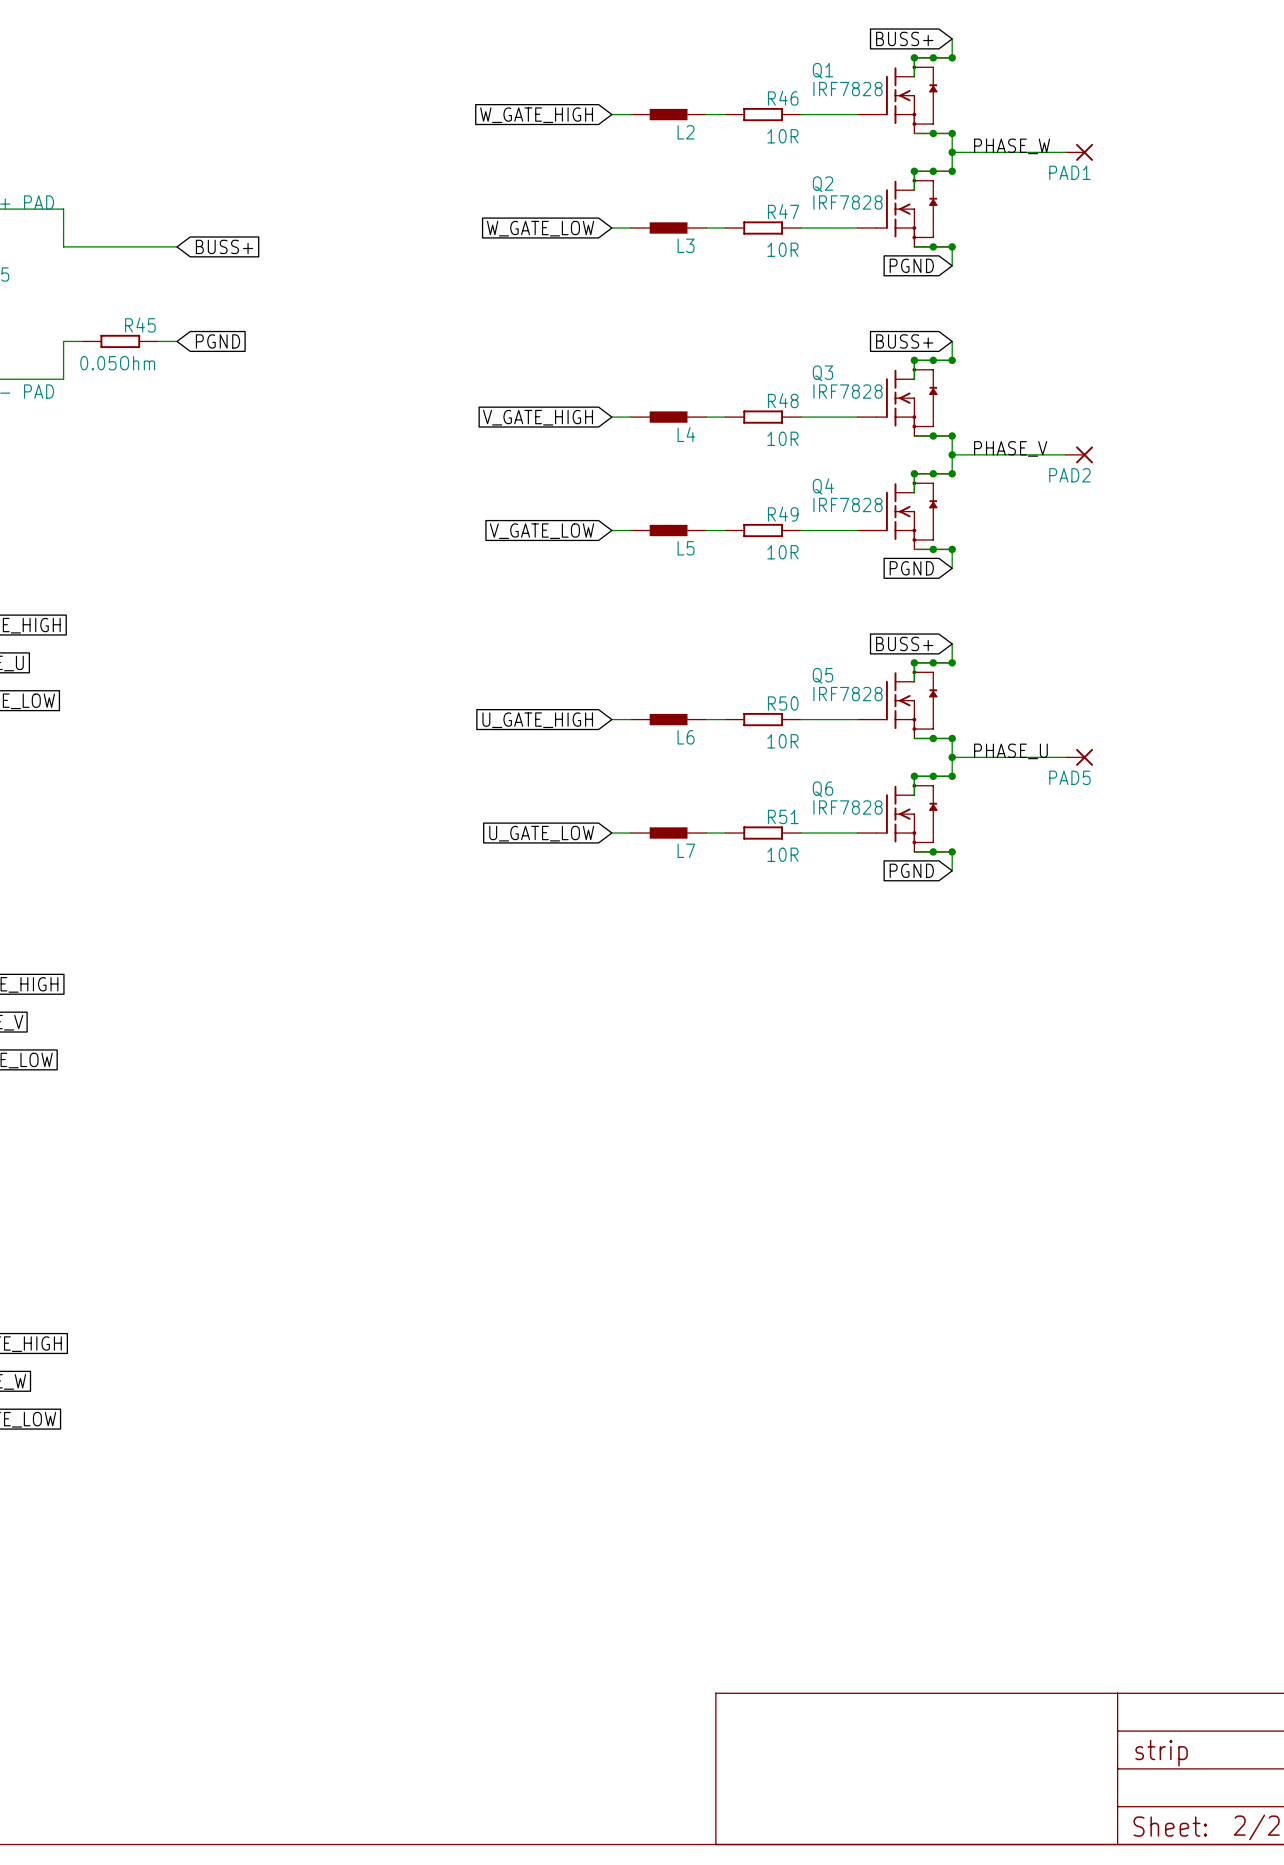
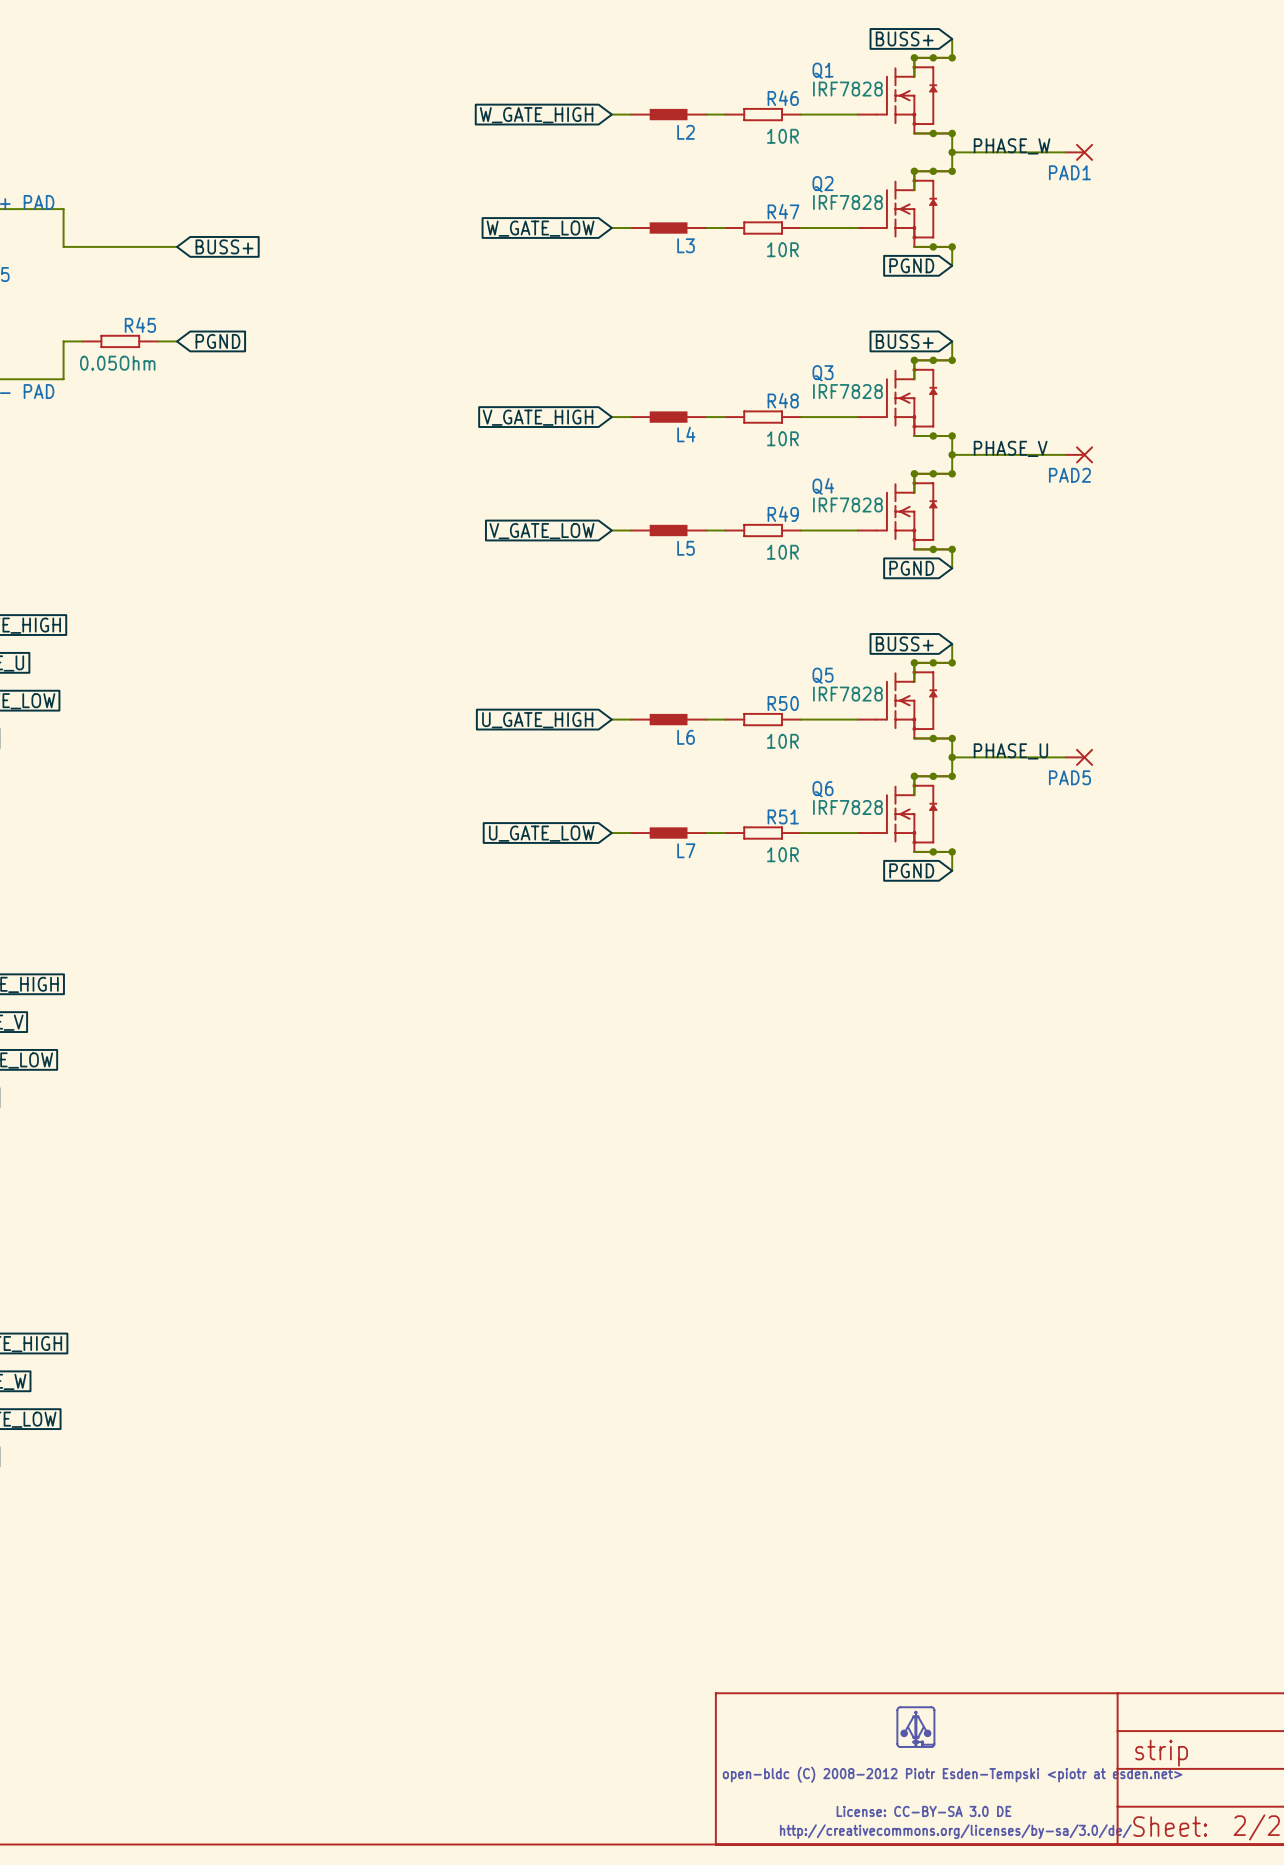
part: none -> (915, 1727)
text: none -> open-bldc (C) 2008-2012 Piotr Esden-Tempski <piotr at esden.net> (952, 1774)
text: none -> License: CC-BY-SA 3.0 DE (923, 1811)
text: none -> http://creativecommons.org/licenses/by-sa/3.0/de/ (955, 1831)

